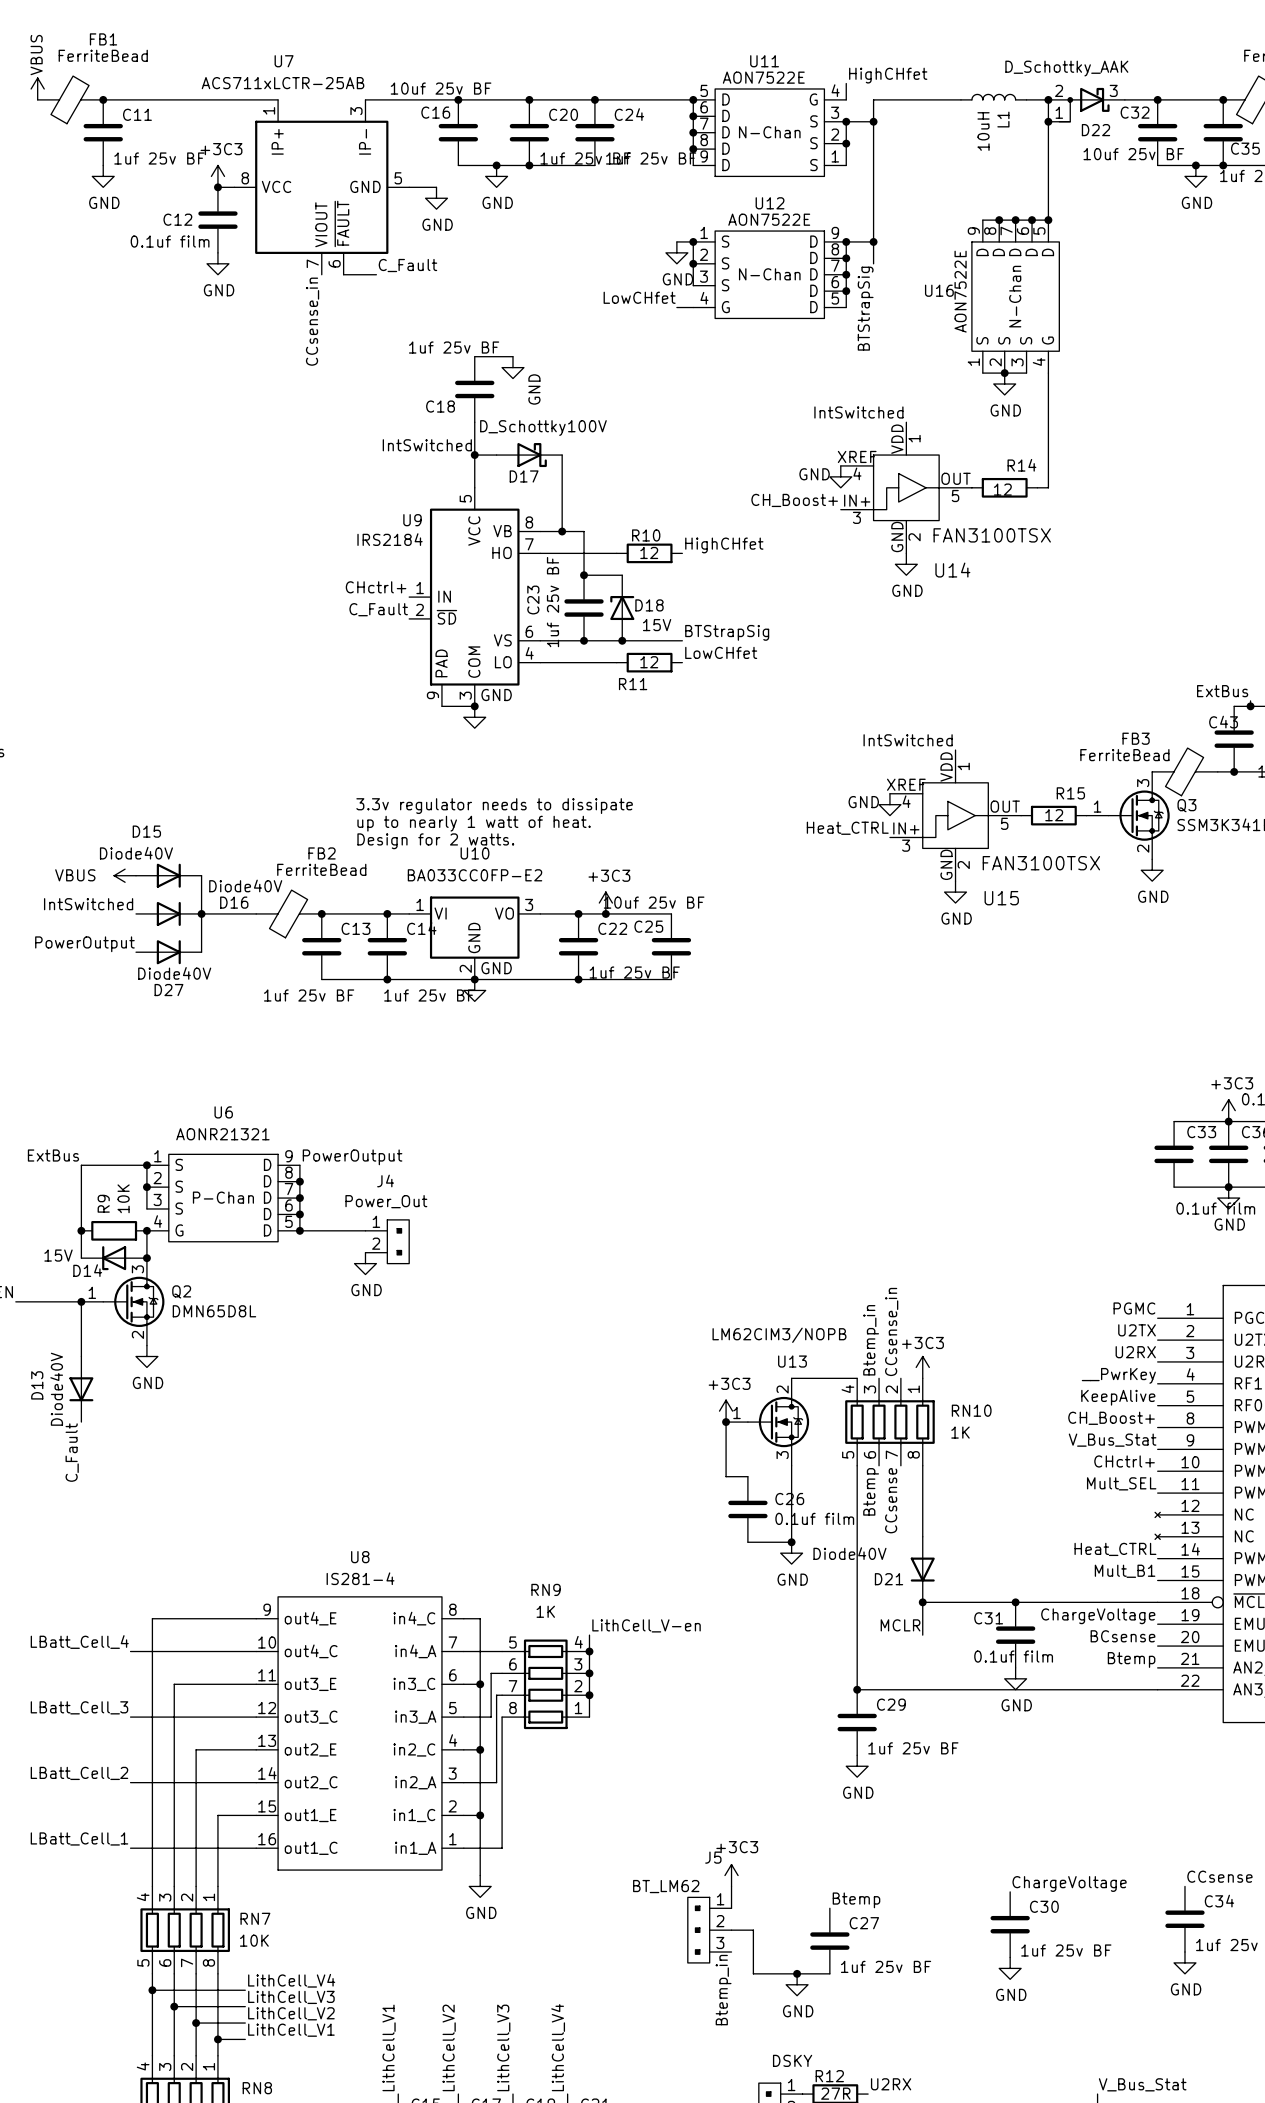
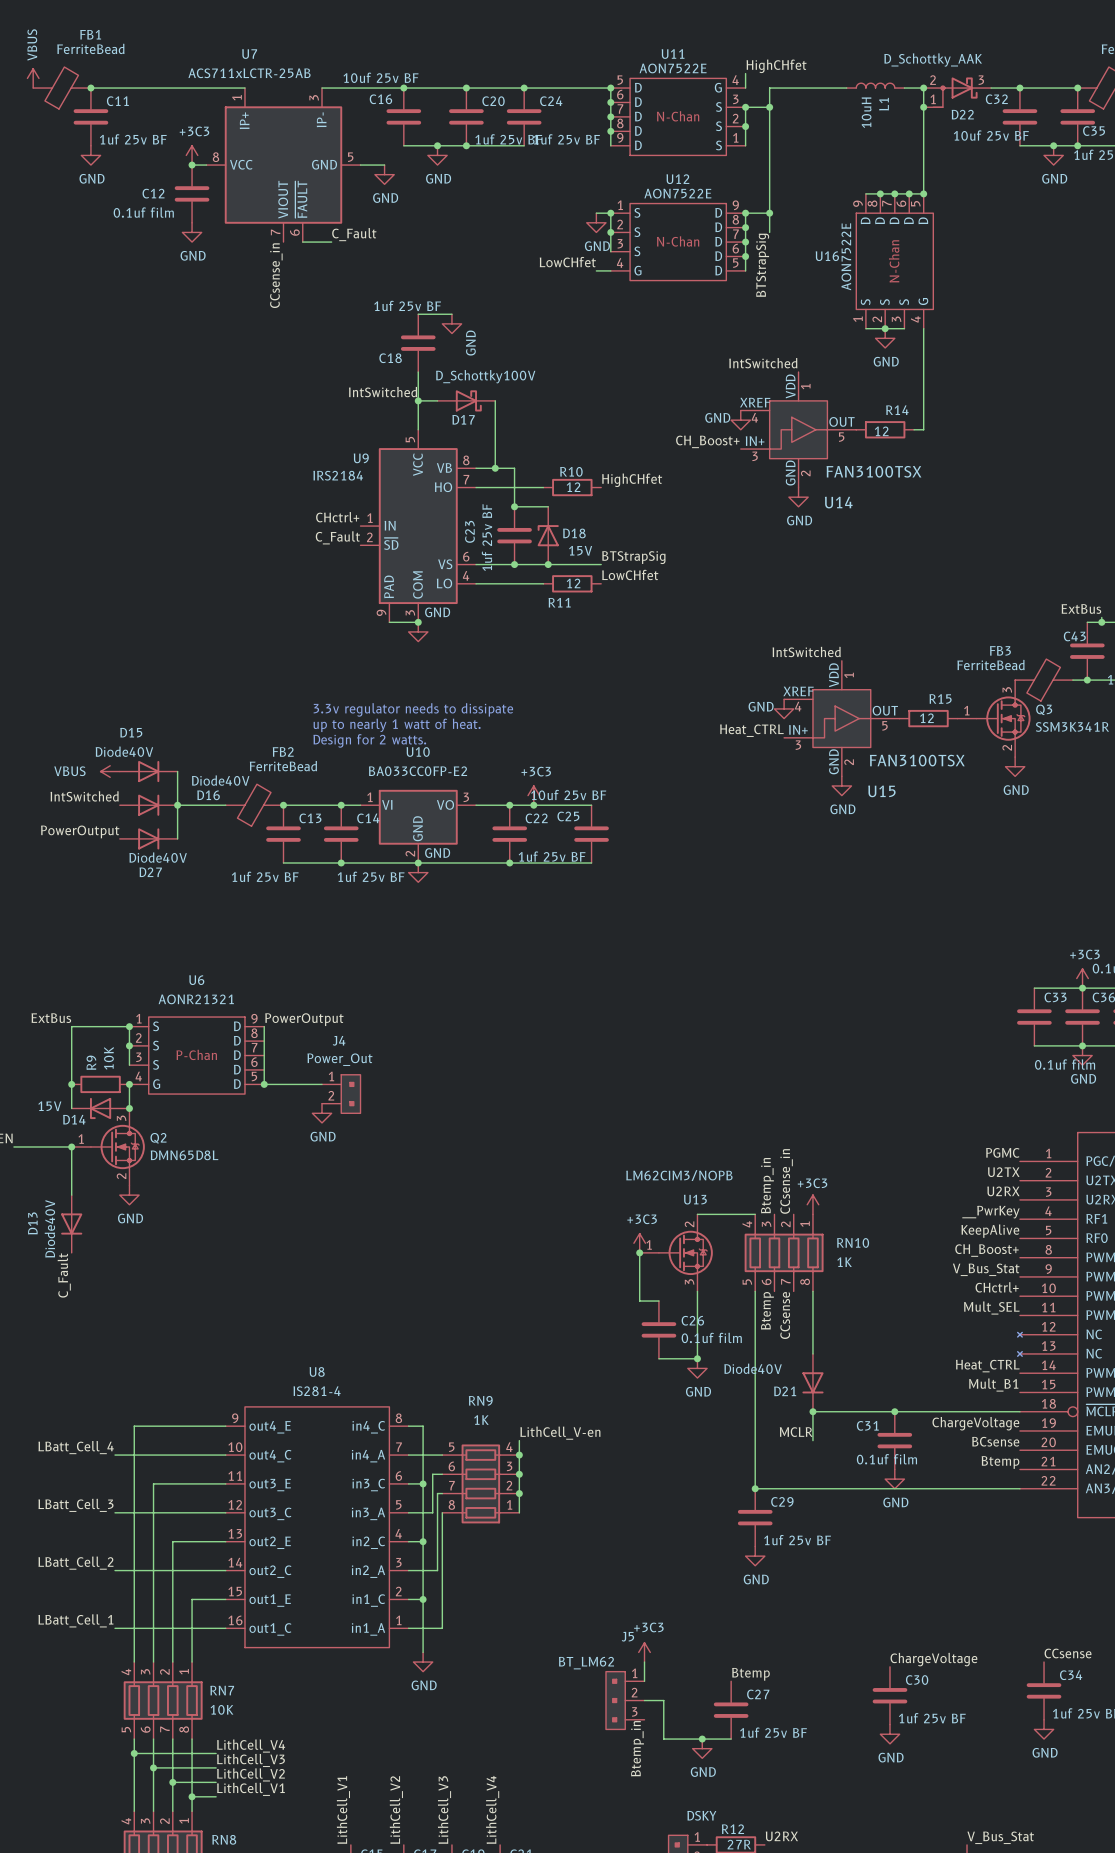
junction: (299, 1181) -> none
junction: (299, 1198) -> none
junction: (299, 1214) -> none

